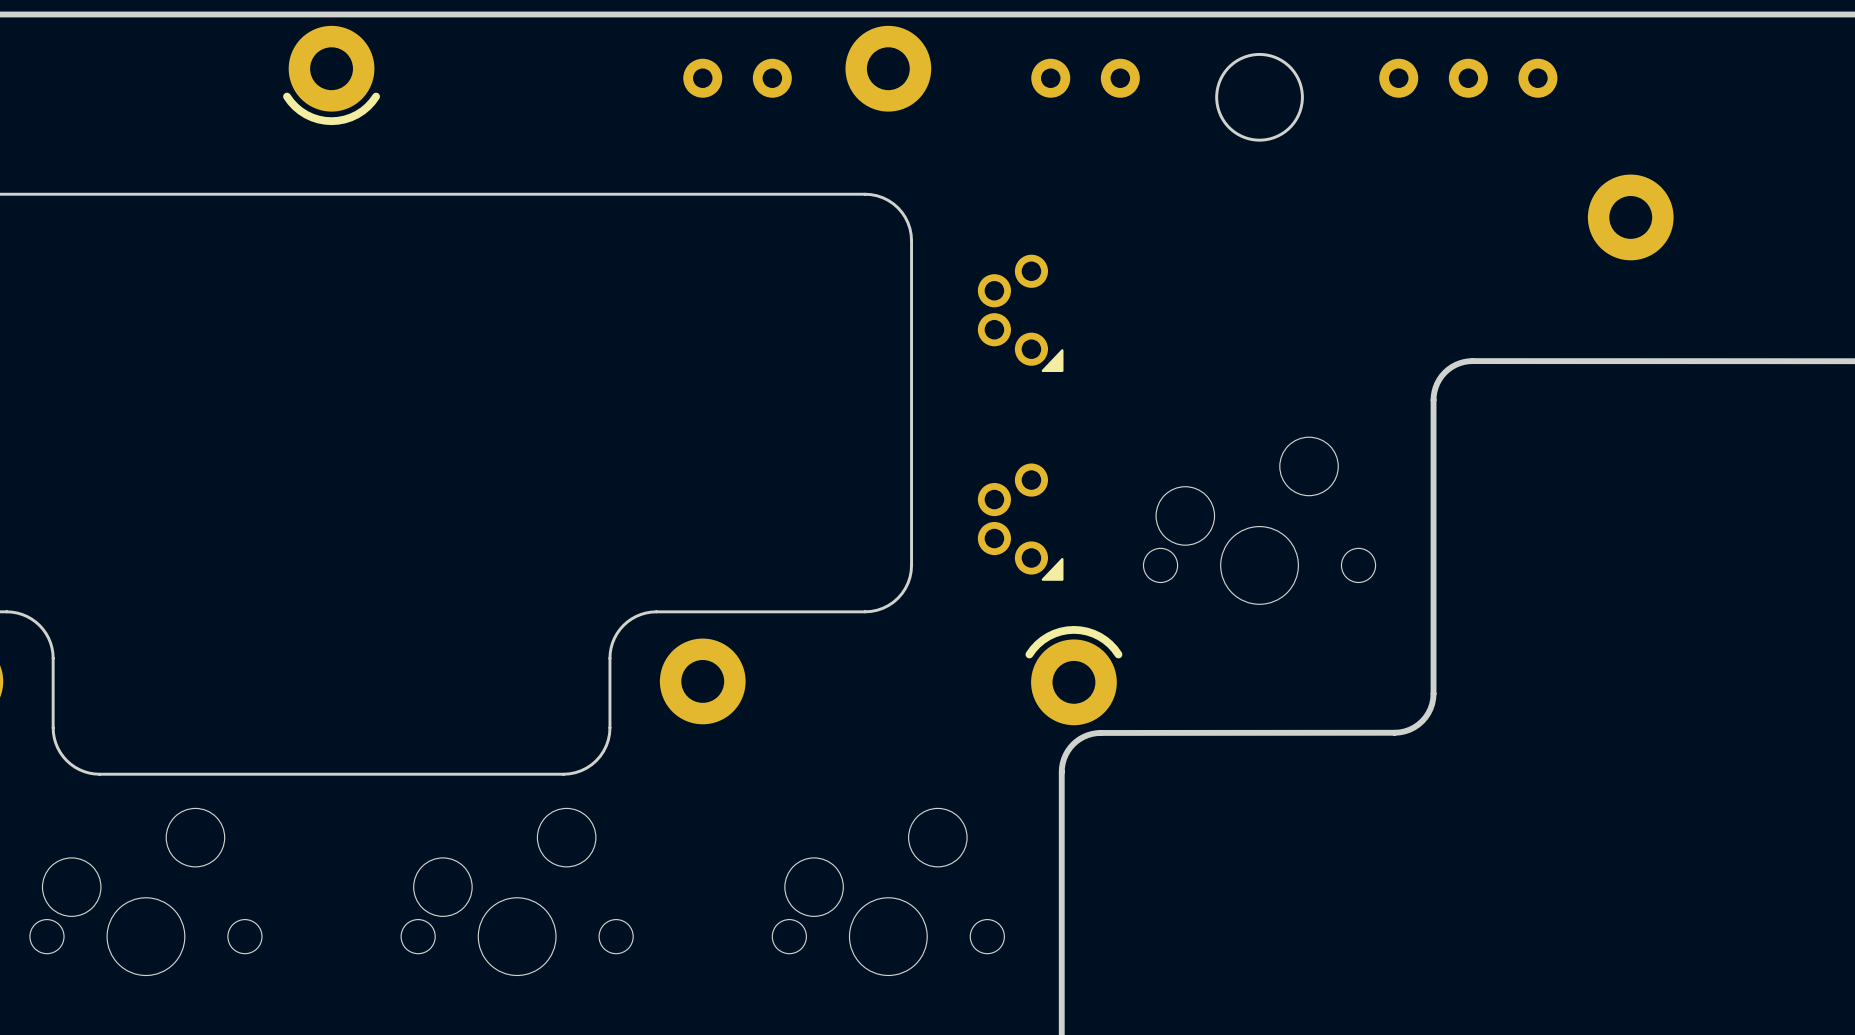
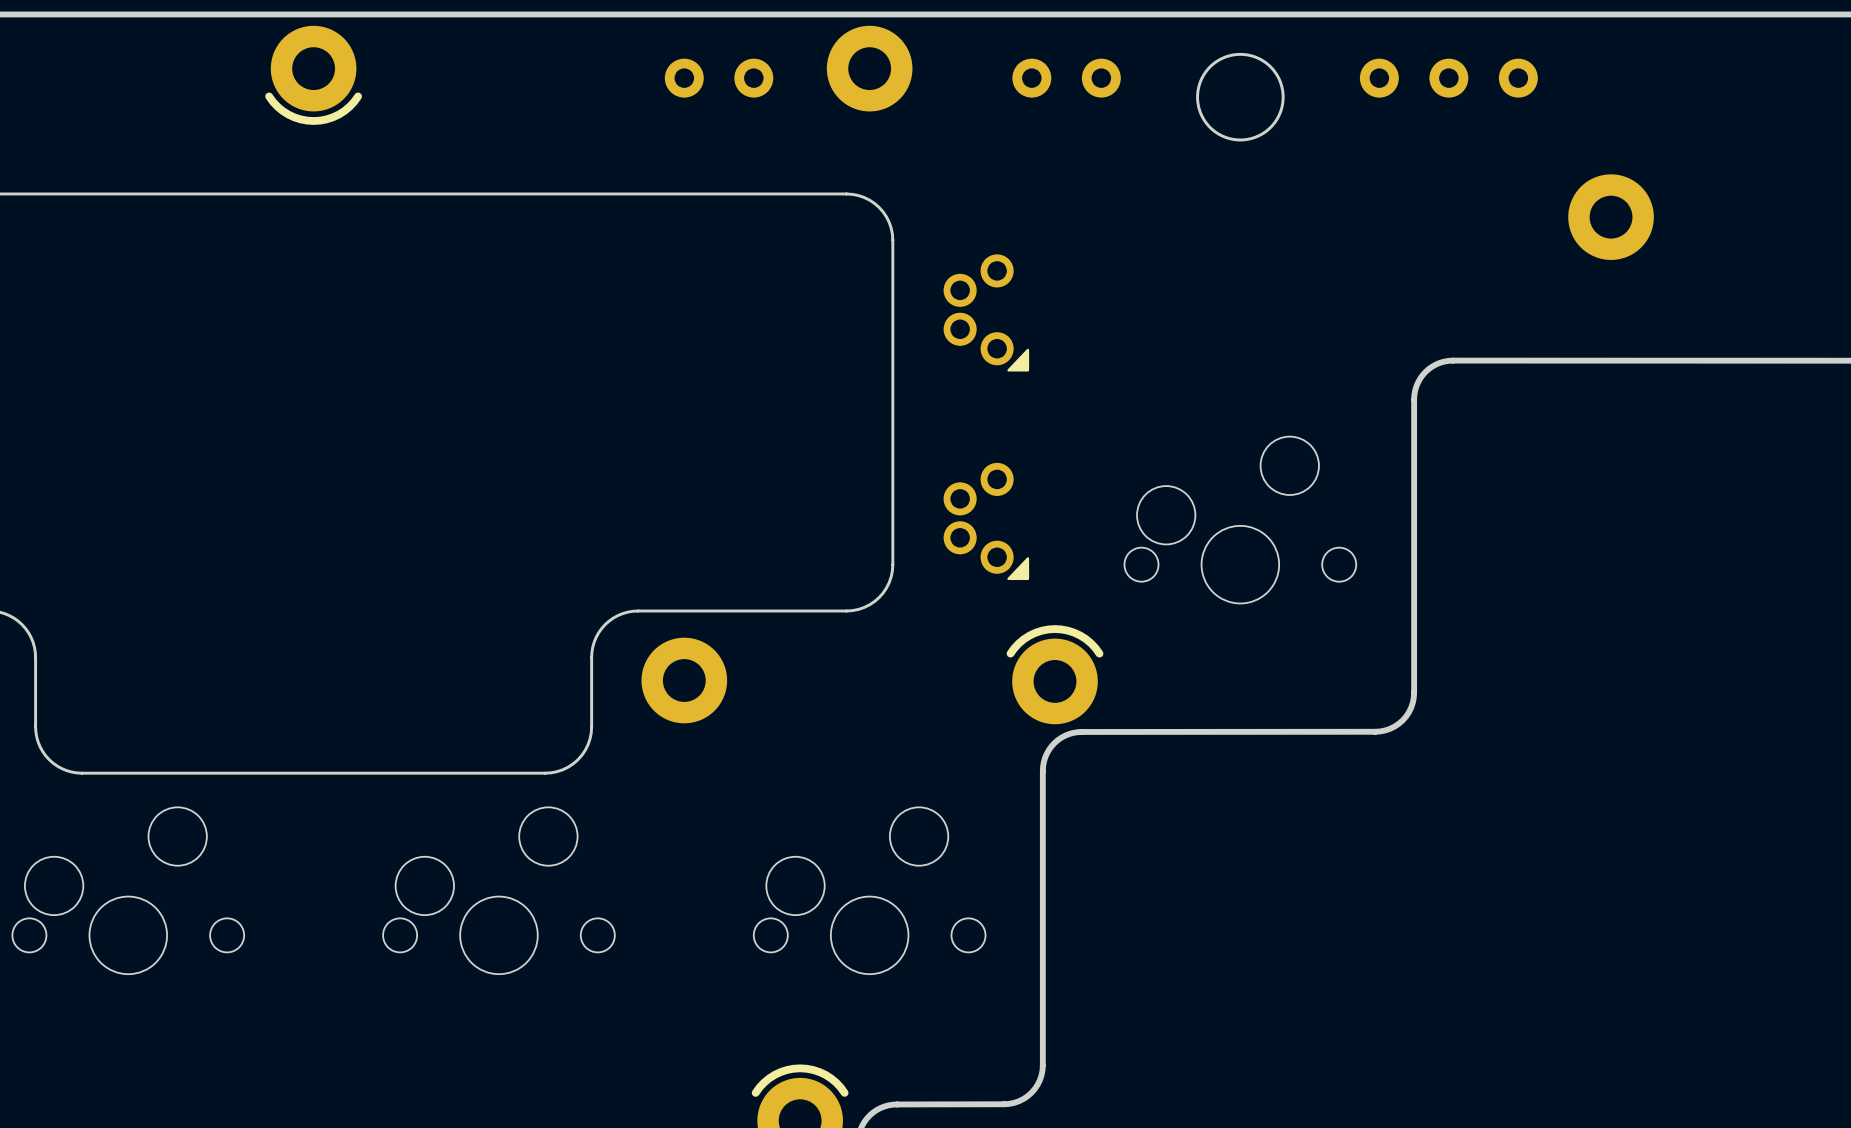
part position: (1020, 313) -> (986, 312)
part position: (1020, 522) -> (986, 521)

